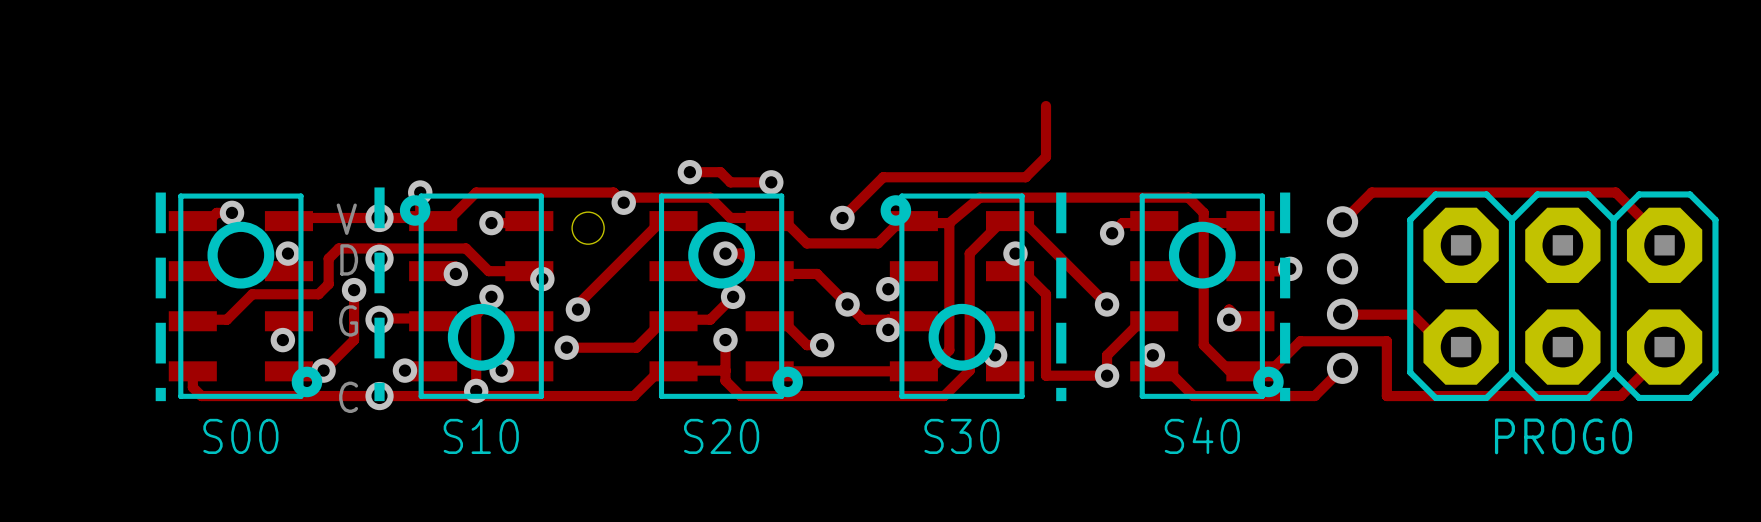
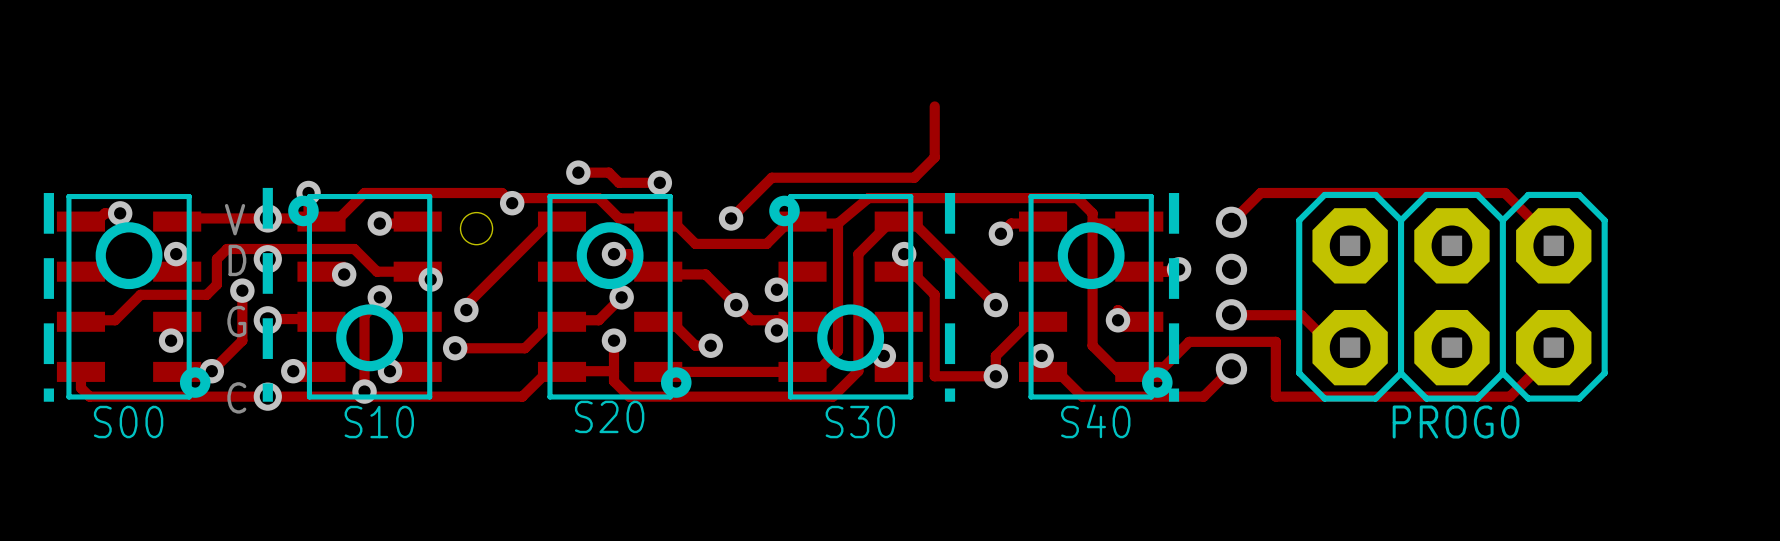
S40 name position: S40 (1202, 435) -> S40 (1095, 421)
S00 name position: S00 (240, 436) -> S00 (128, 422)
S10 name position: S10 (481, 436) -> S10 (379, 422)
S20 name position: S20 (721, 436) -> S20 (609, 416)
S30 name position: S30 (961, 436) -> S30 (860, 422)
PROG0 name position: PROG0 (1563, 436) -> PROG0 (1456, 422)

